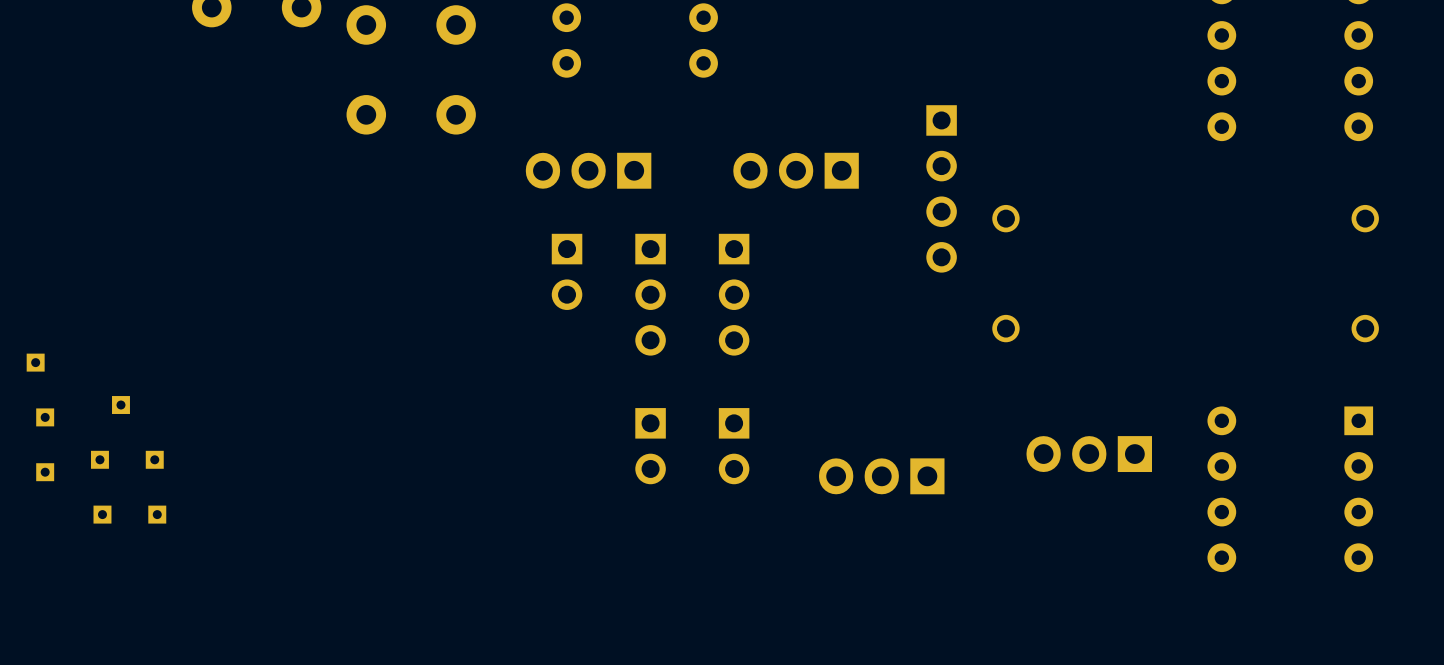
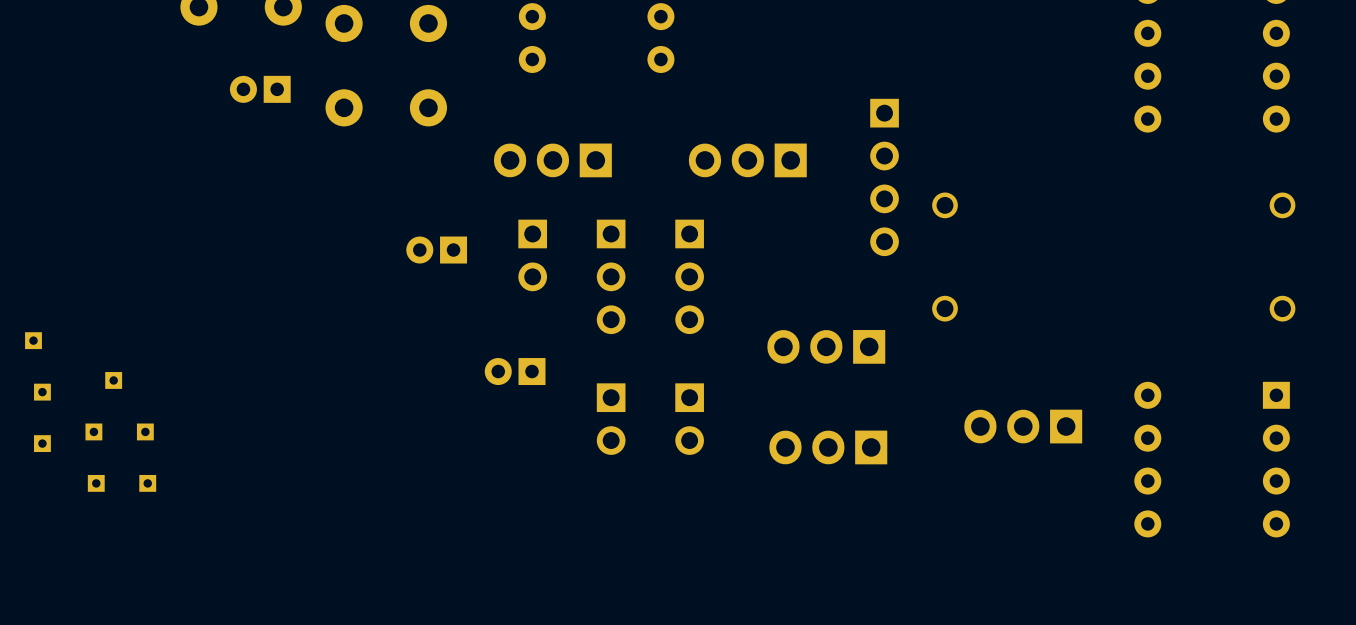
part: none -> (260, 89)
part: none -> (436, 250)
part: none -> (826, 346)
part: none -> (515, 371)

